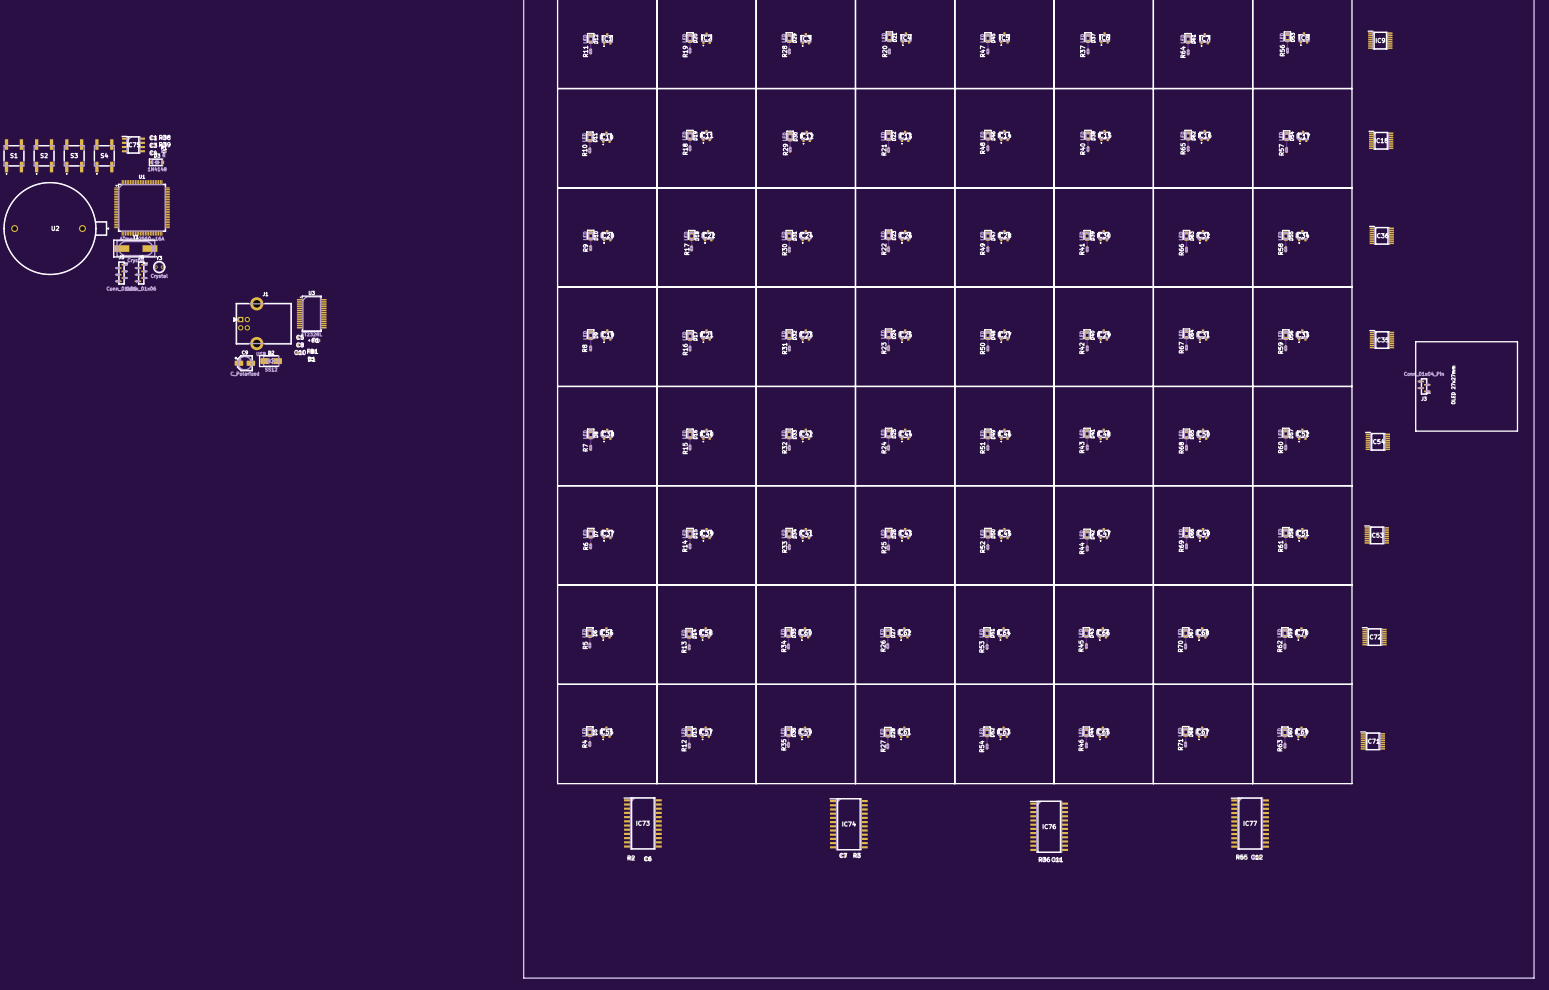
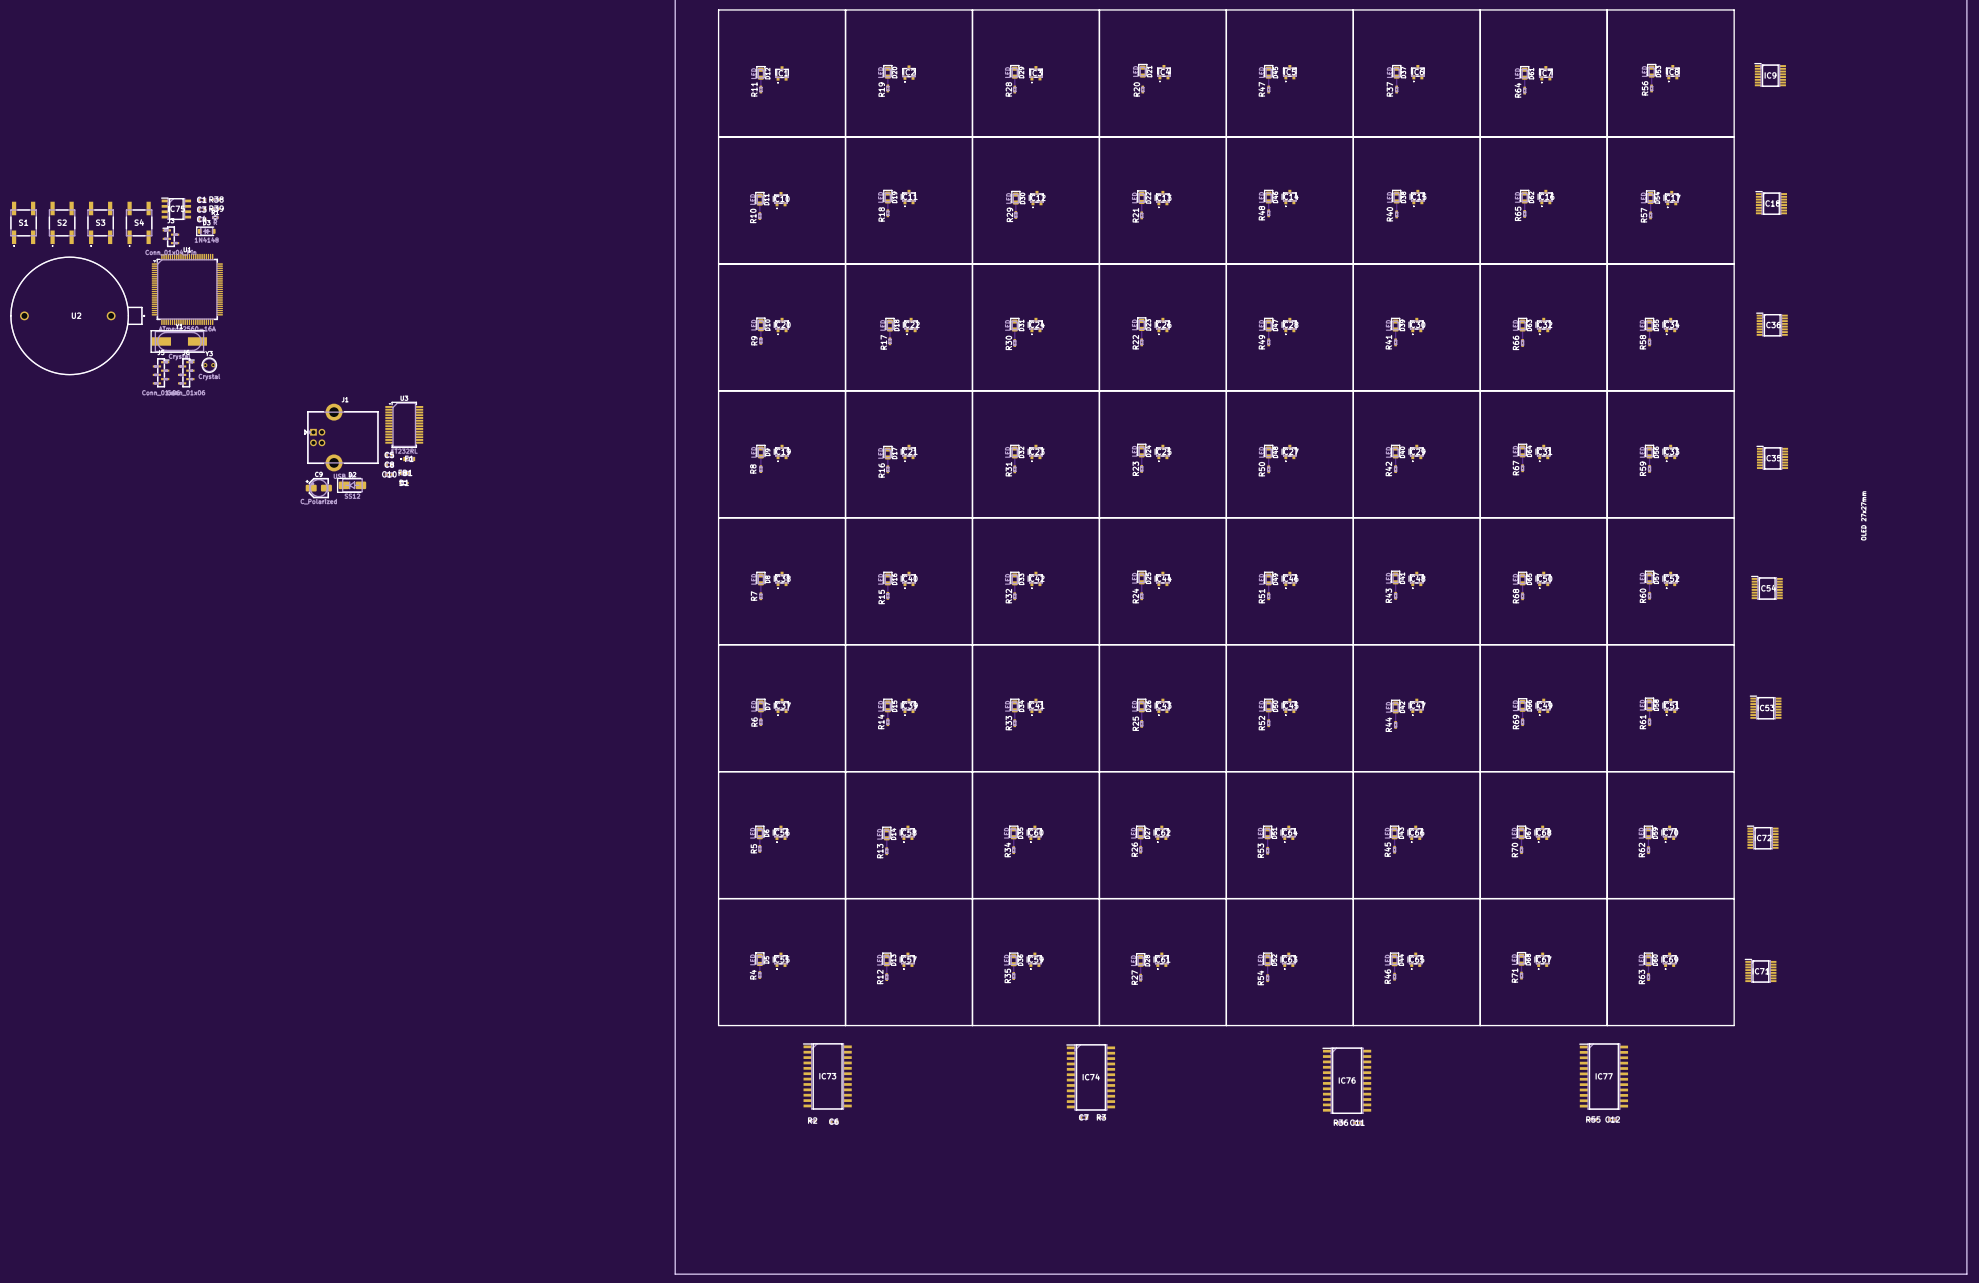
line: (1415, 341) (1517, 341) (1517, 431) (1415, 431) (1415, 341) -> none
part rotation: 0° (1424, 386) -> 180° (170, 236)
part position: (1424, 386) -> (170, 236)

